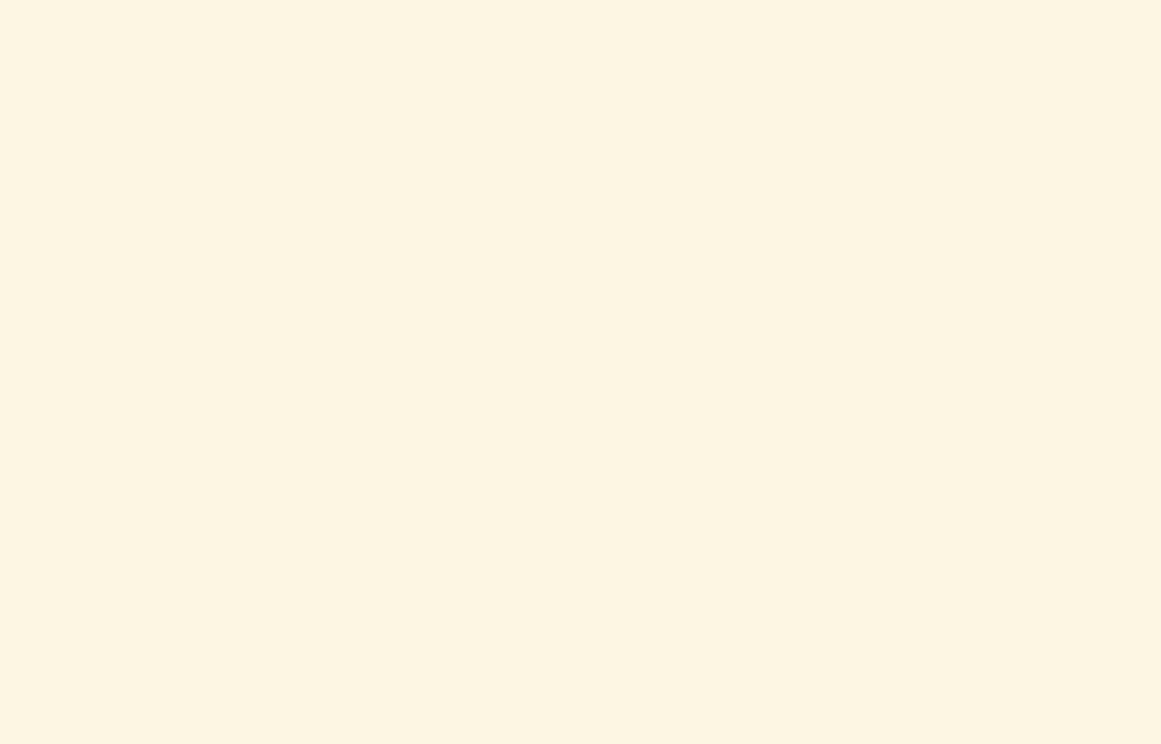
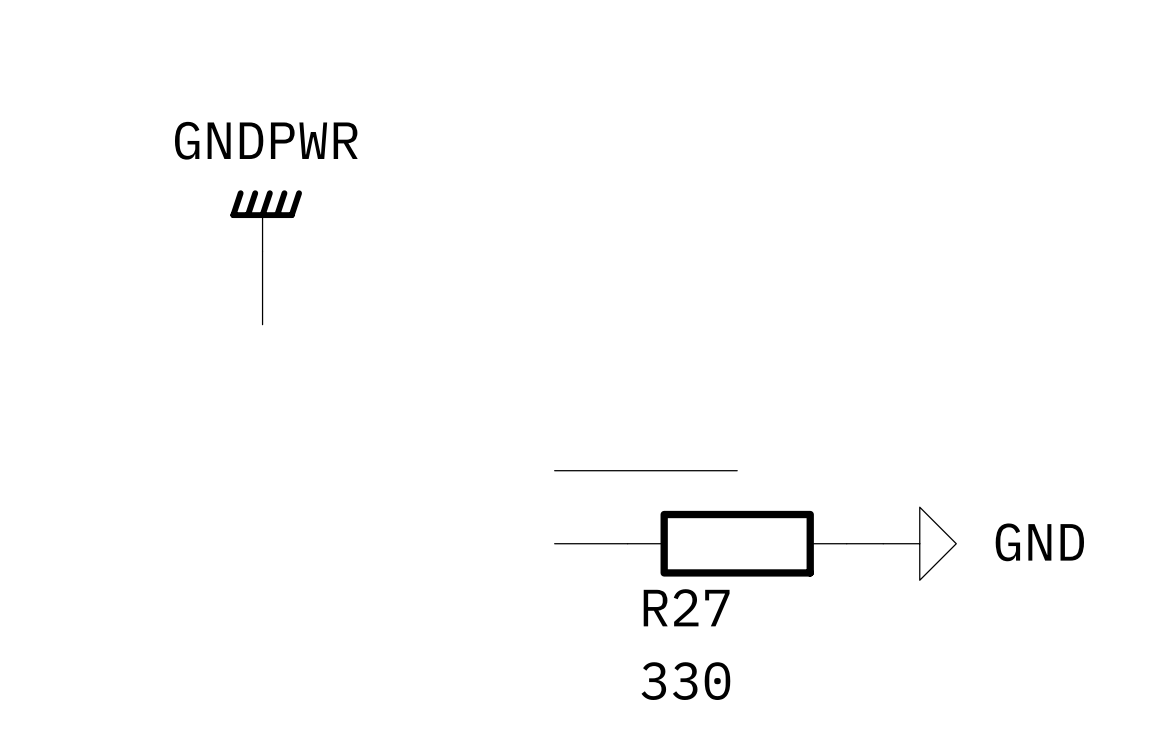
power symbol: none -> GNDPWR (266, 220)
wire: none -> (262, 251) (262, 324)
wire: none -> (554, 470) (737, 470)
wire: none -> (554, 543) (627, 543)
R27: none -> 330 (737, 543)
wire: none -> (846, 543) (883, 543)
power symbol: none -> GND (919, 543)

